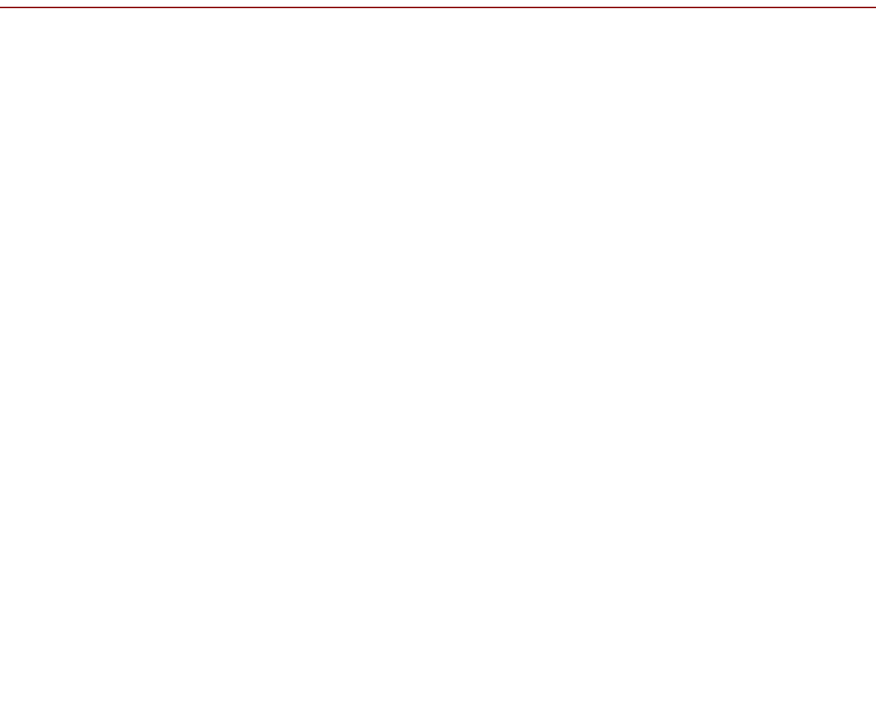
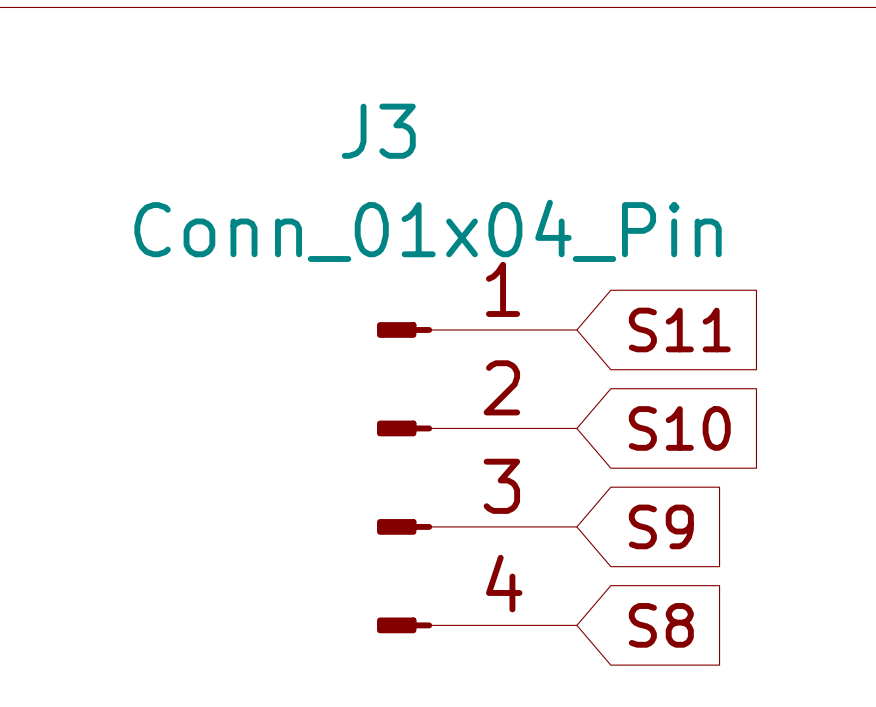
global label: none -> S11 (679, 329)
global label: none -> S10 (679, 428)
J3: none -> Conn_01x04_Pin (476, 477)
global label: none -> S9 (661, 526)
global label: none -> S8 (661, 625)

